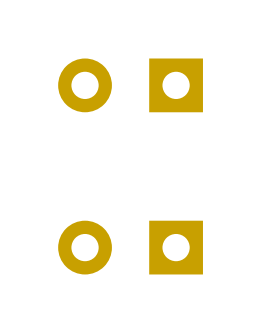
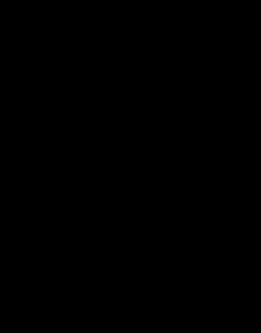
part: (130, 85) -> none
part: (130, 247) -> none

